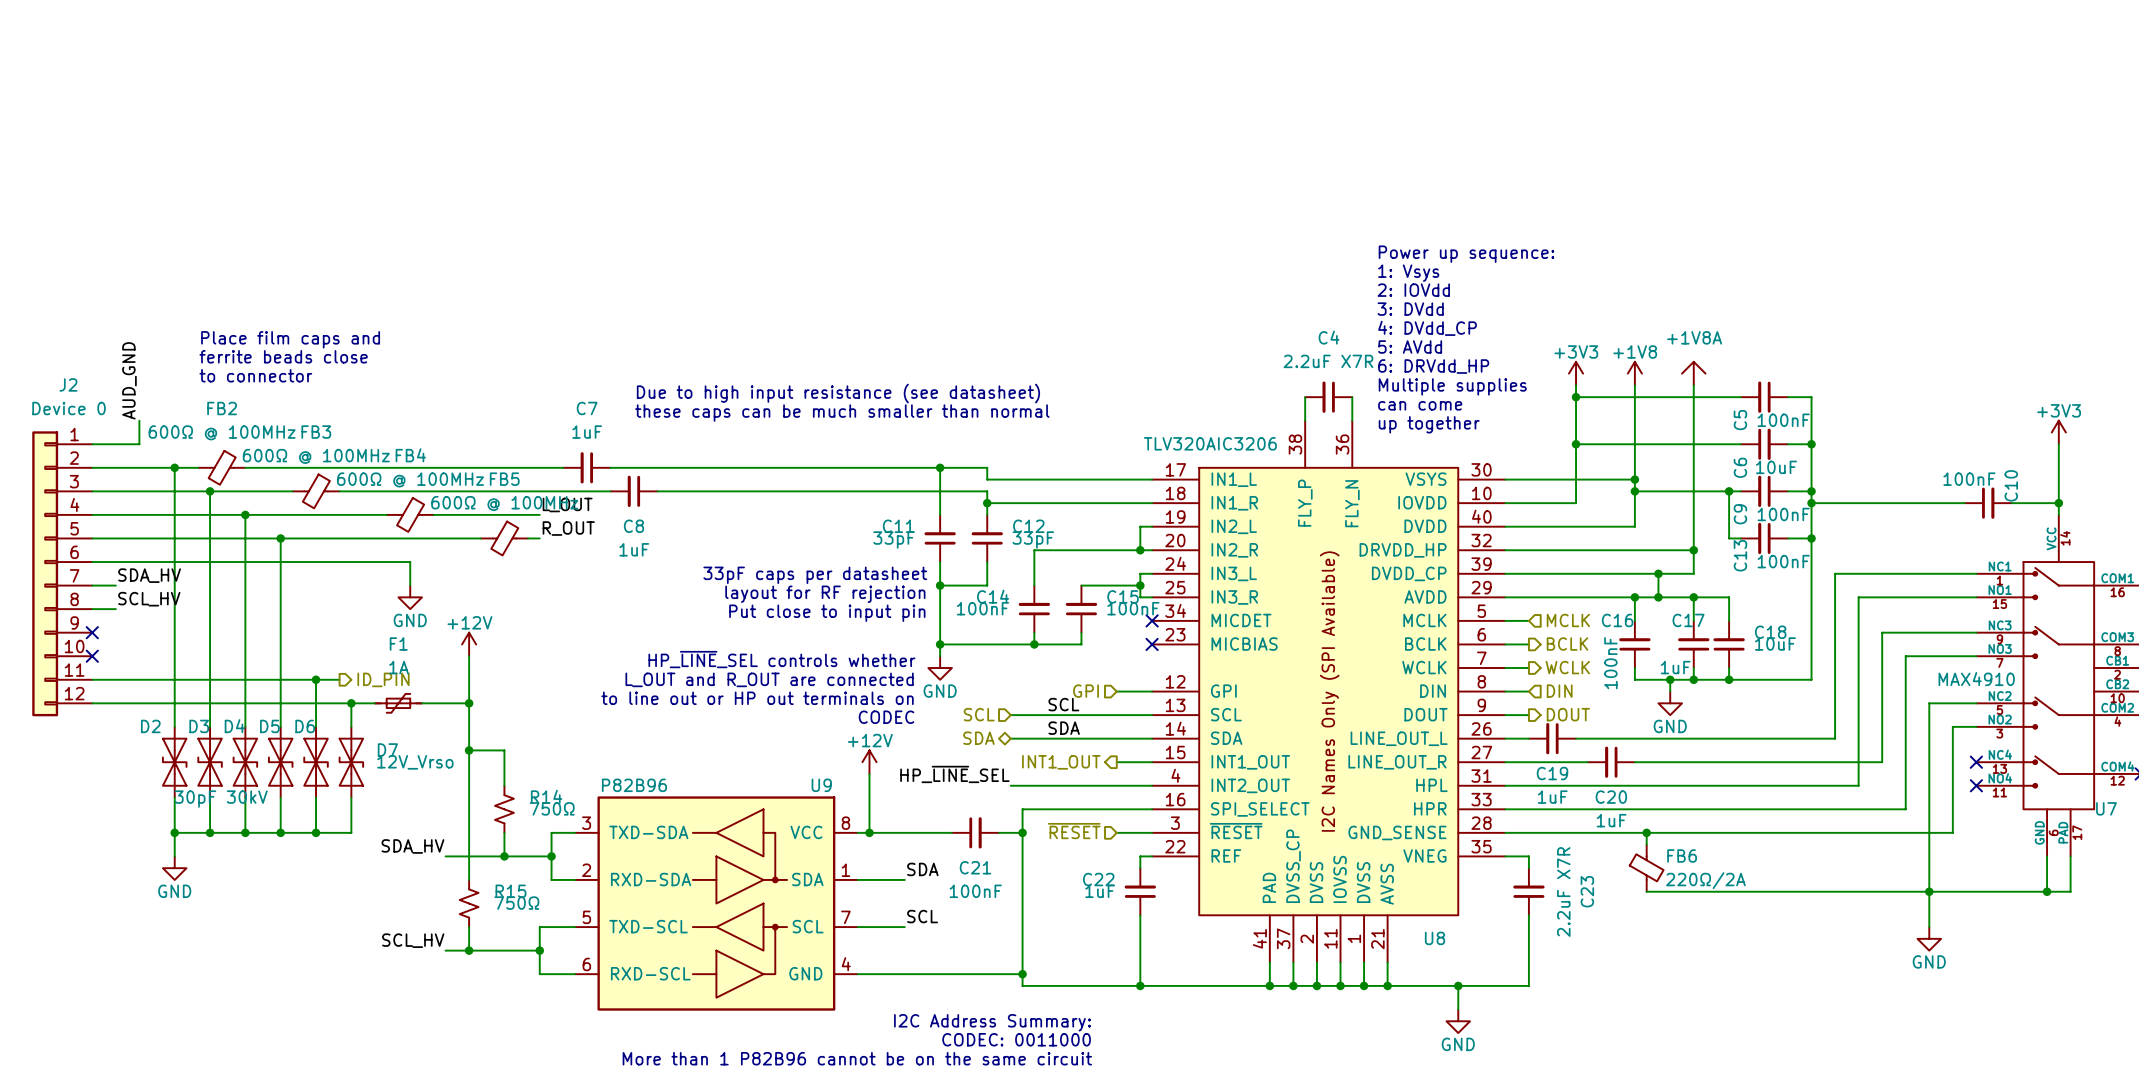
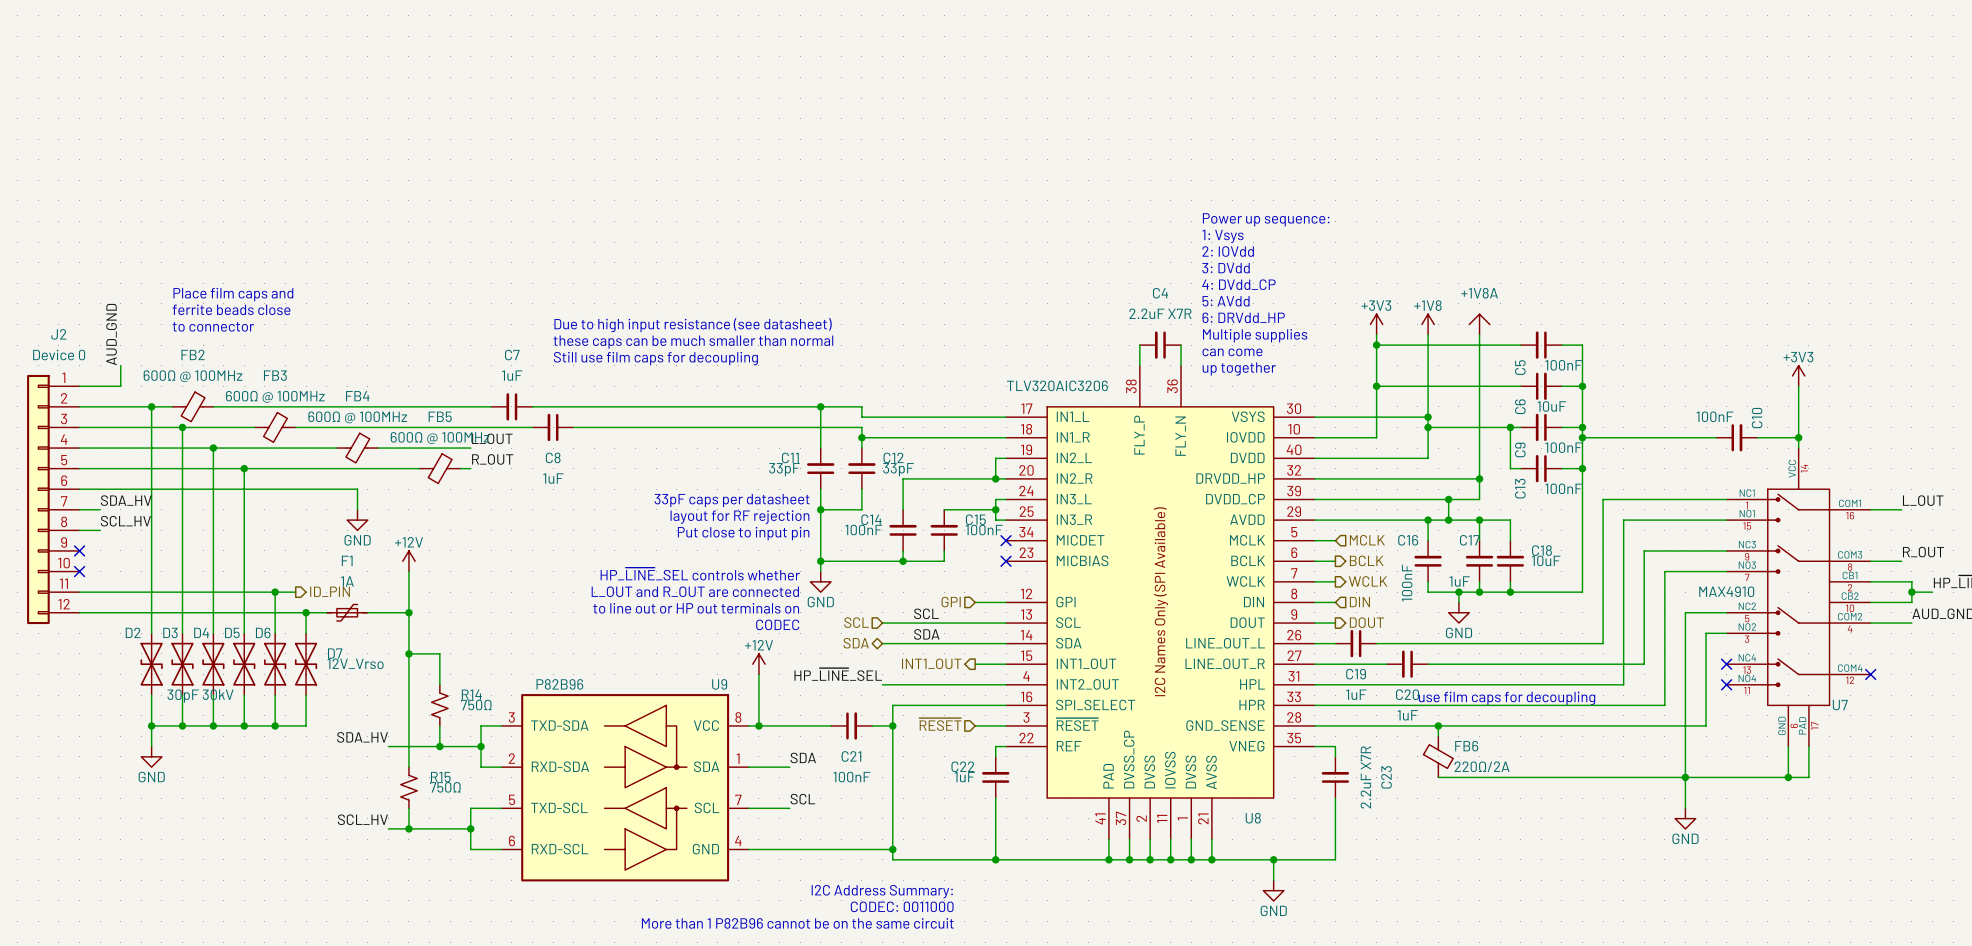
text: none -> Due to high input resistance (see datasheet) (693, 325)
text: Due to high input resistance (see datasheet) (838, 393) -> these caps can be much smaller than normal (693, 342)
text: these caps can be much smaller than normal (842, 413) -> Still use film caps for decoupling (655, 358)
text: none -> use film caps for decoupling (1507, 698)

